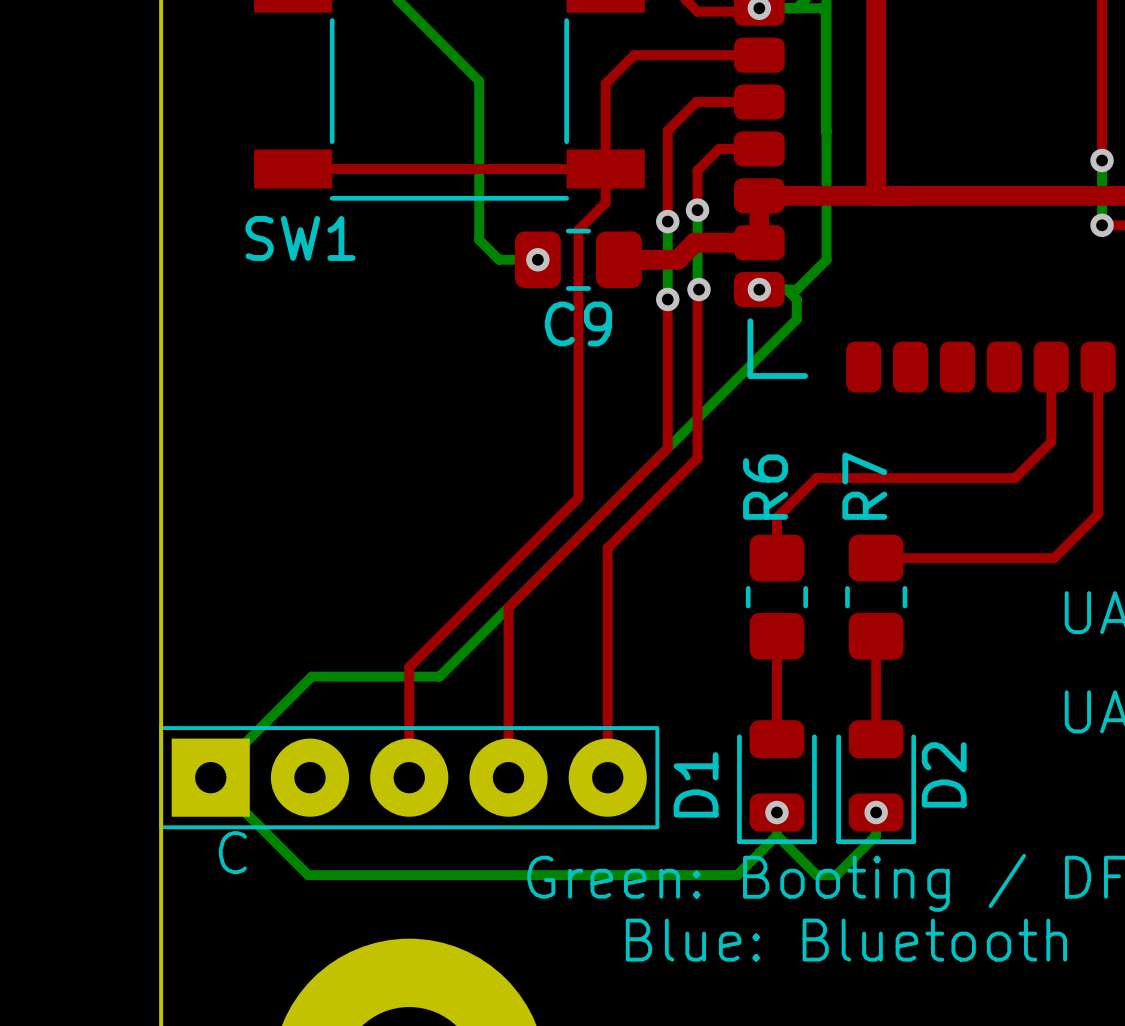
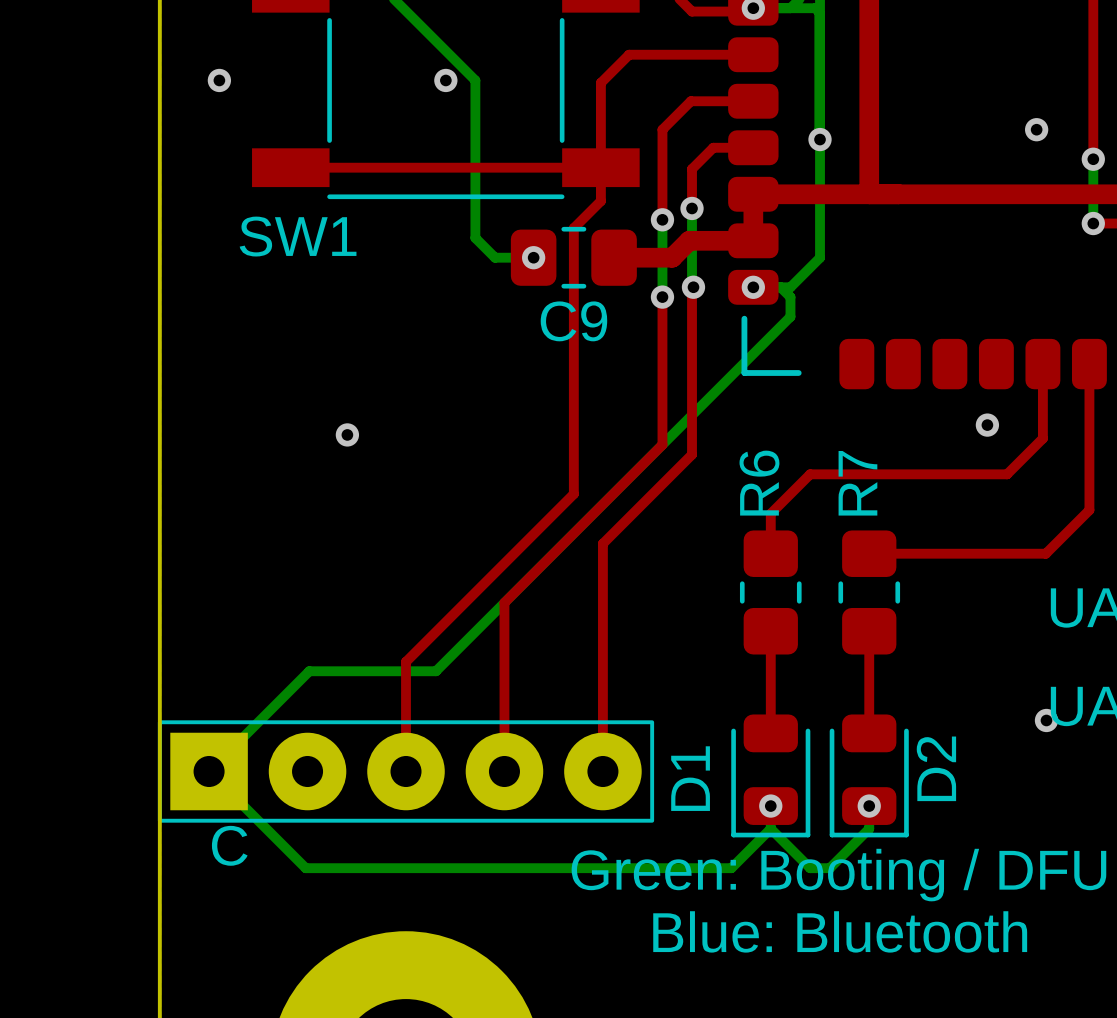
via: none -> (219, 80)
via: none -> (445, 80)
via: none -> (1036, 129)
via: none -> (820, 139)
via: none -> (987, 425)
via: none -> (347, 434)
via: none -> (1046, 720)

